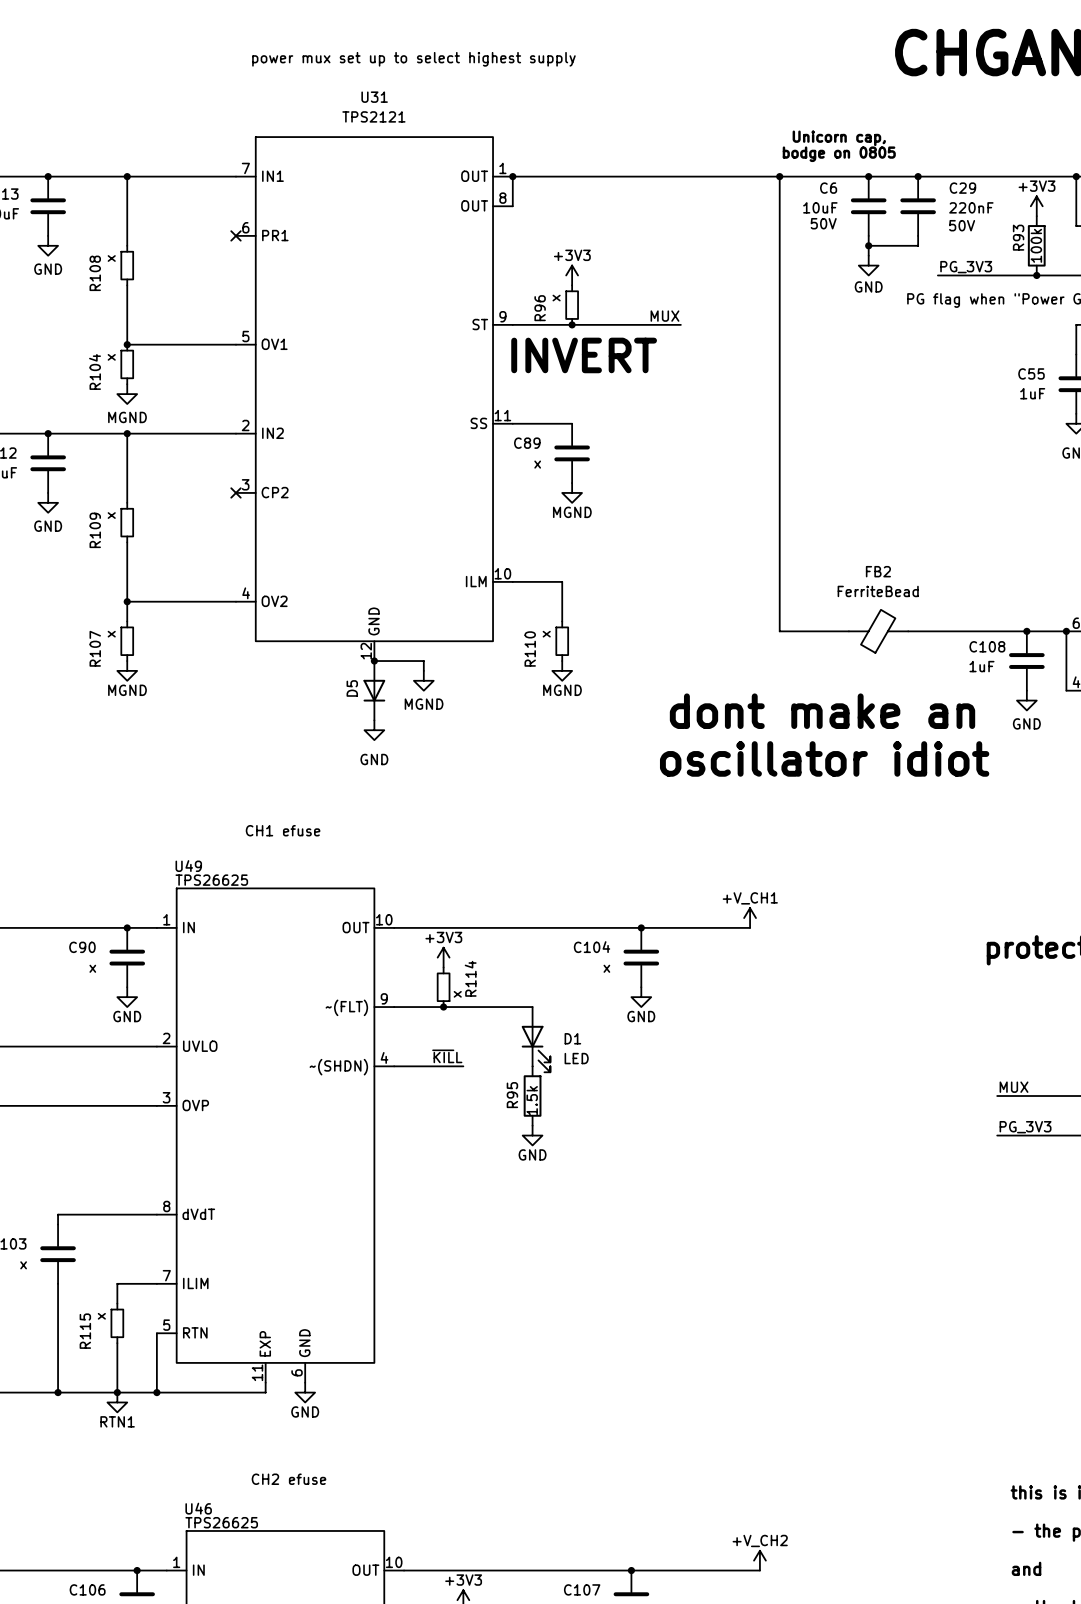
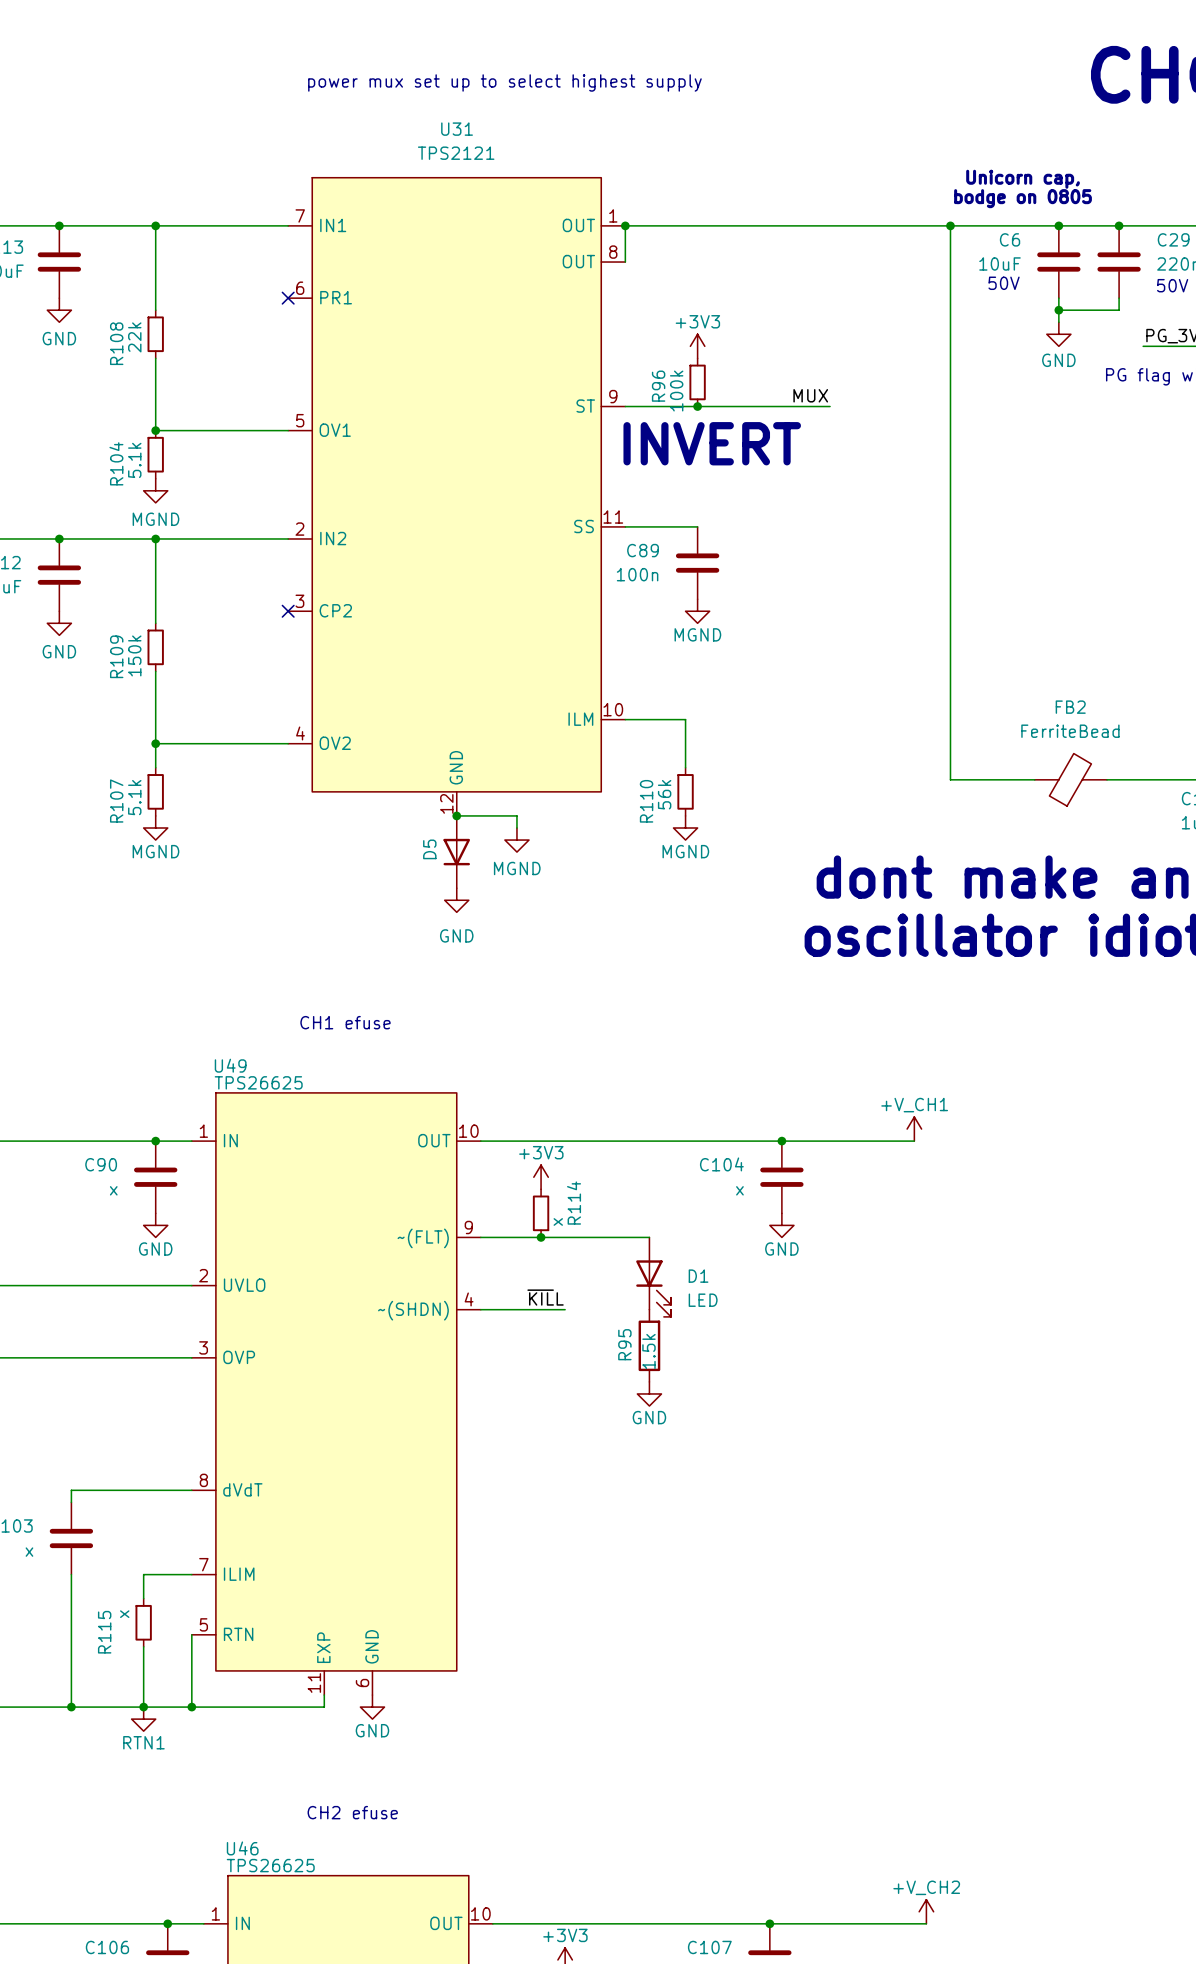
R108 value: x (111, 258) -> 22k (134, 337)
R96 value: x (556, 298) -> 100k (676, 391)
R104 value: x (111, 357) -> 5.1k (134, 460)
C89 value: x (537, 464) -> 100n (637, 574)
R109 value: x (111, 515) -> 150k (134, 655)
R107 value: x (111, 634) -> 5.1k (134, 797)
R110 value: x (546, 634) -> 56k (664, 794)

